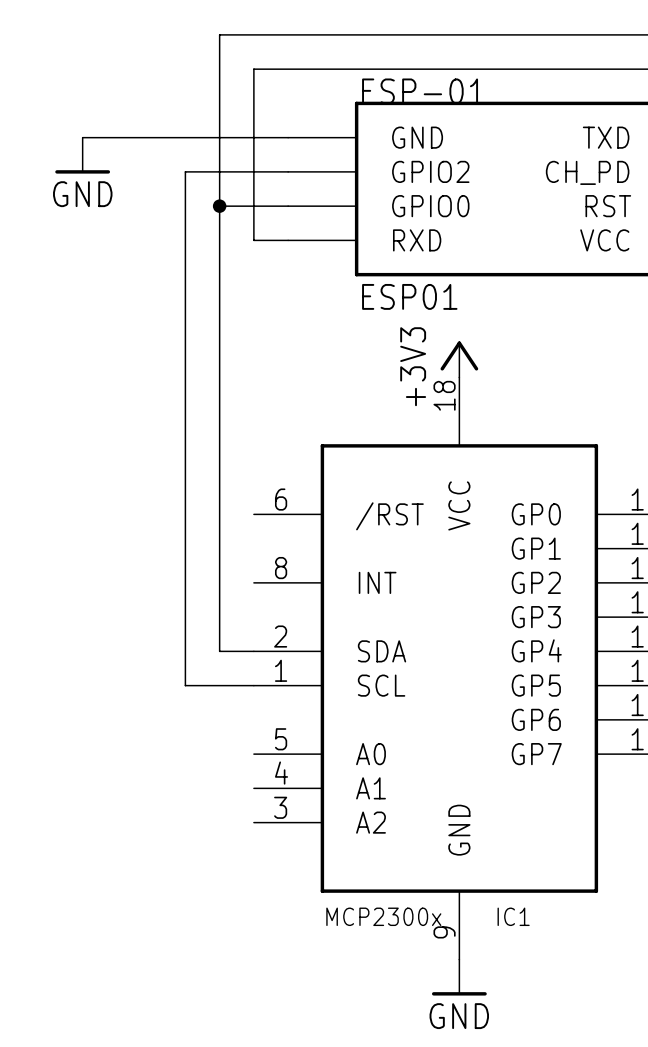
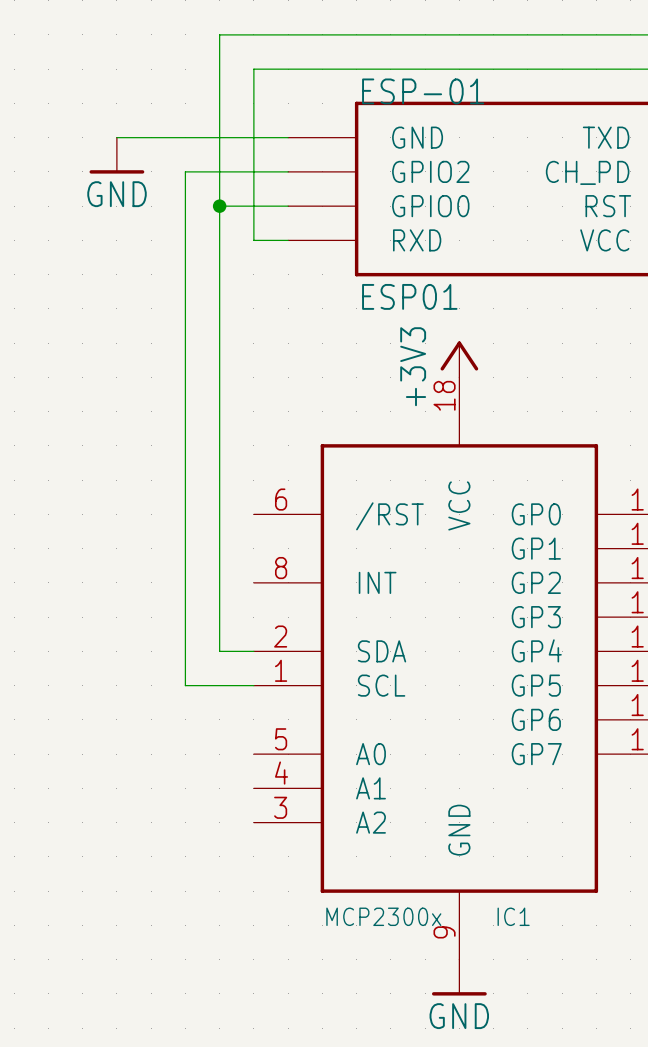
wire: (82, 137) (116, 137) -> none
power symbol position: GND (82, 155) -> GND (116, 155)

